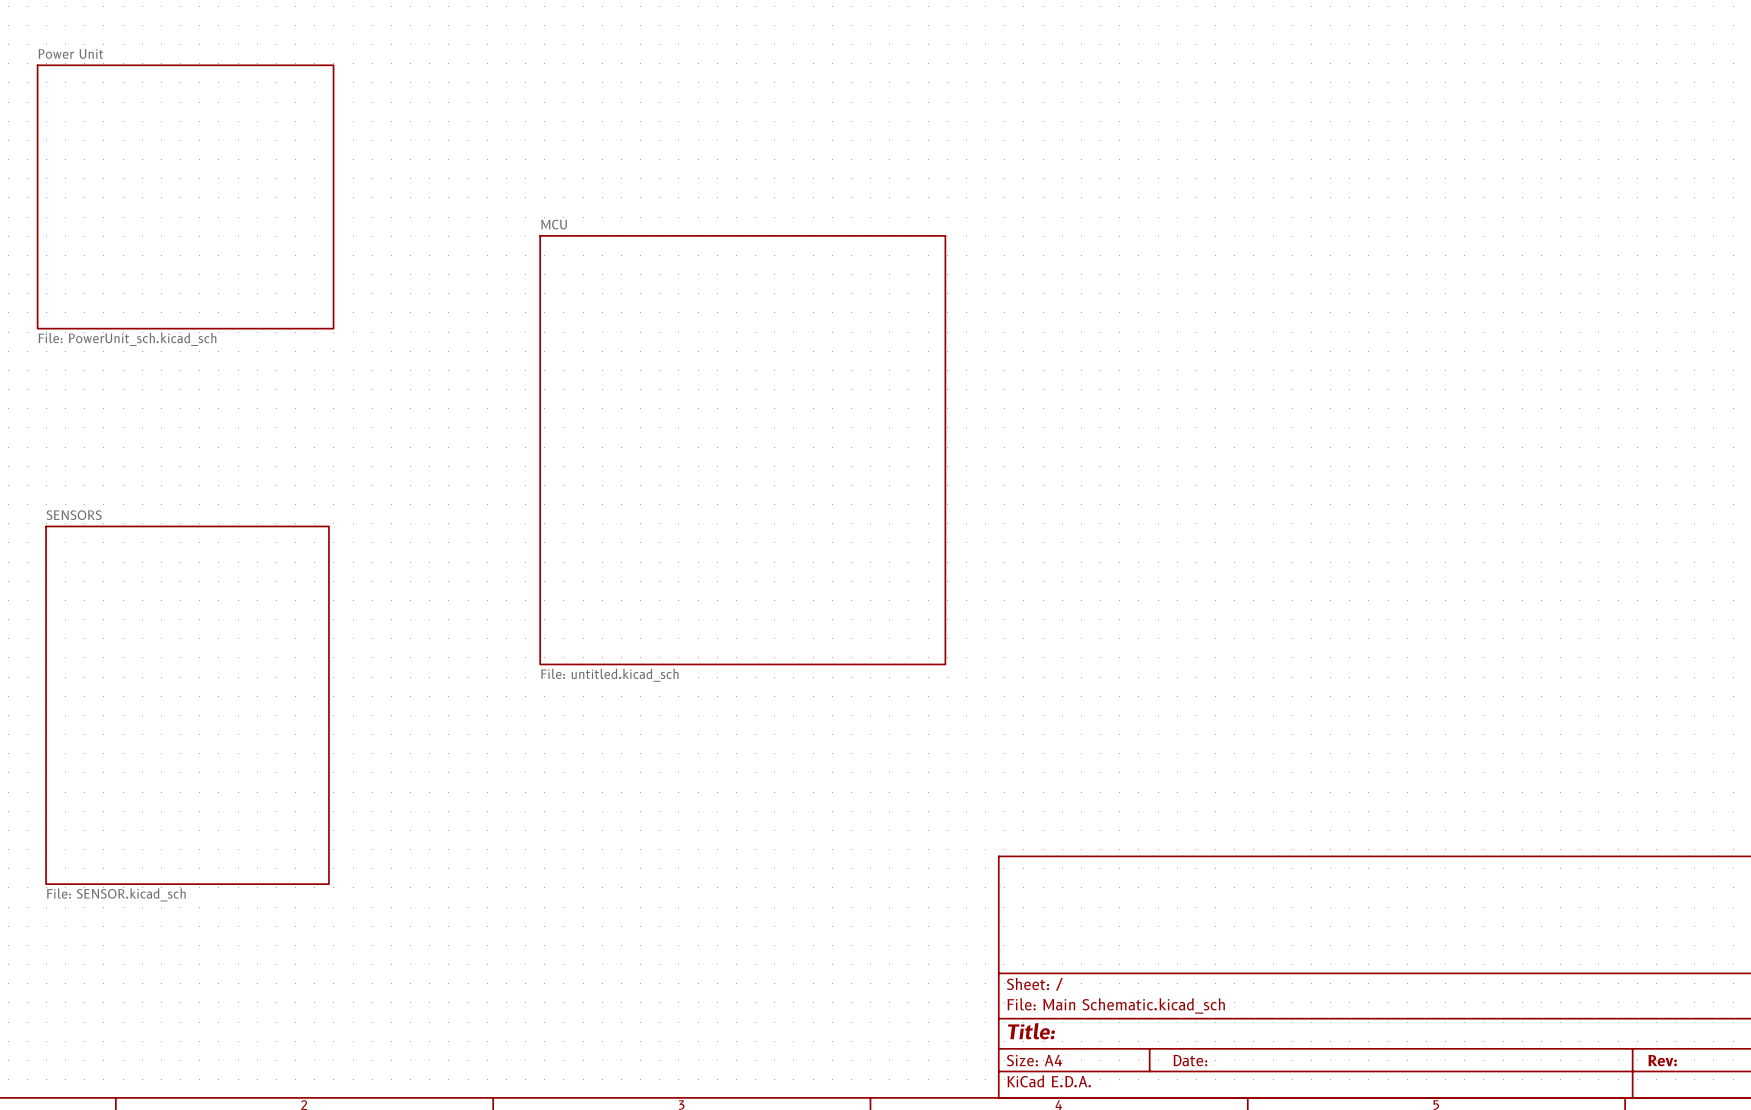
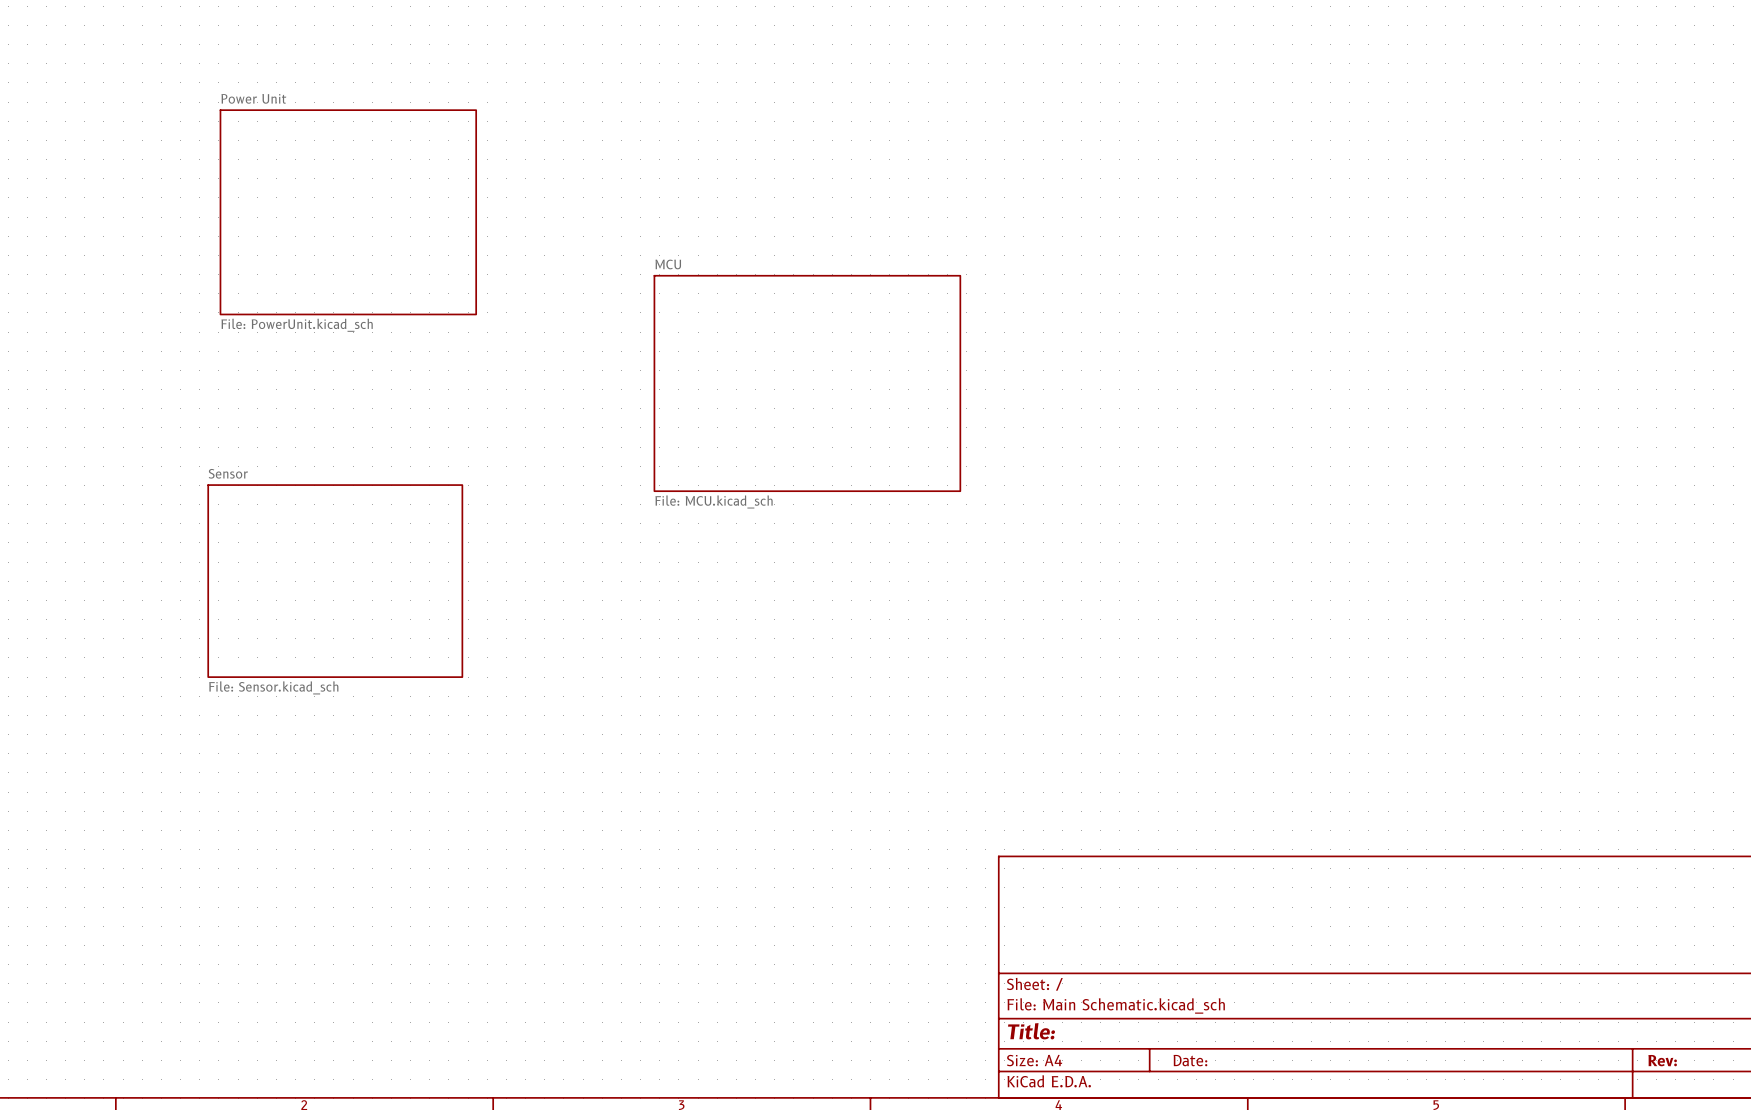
sheet Power Unit: File: PowerUnit_sch.kicad_sch (185, 196) -> none
sheet Power Unit: none -> File: PowerUnit.kicad_sch (348, 212)
sheet MCU: none -> File: MCU.kicad_sch (807, 383)
sheet MCU: File: untitled.kicad_sch (742, 450) -> none
sheet Sensor: none -> File: Sensor.kicad_sch (335, 581)
sheet SENSORS: File: SENSOR.kicad_sch (187, 705) -> none

